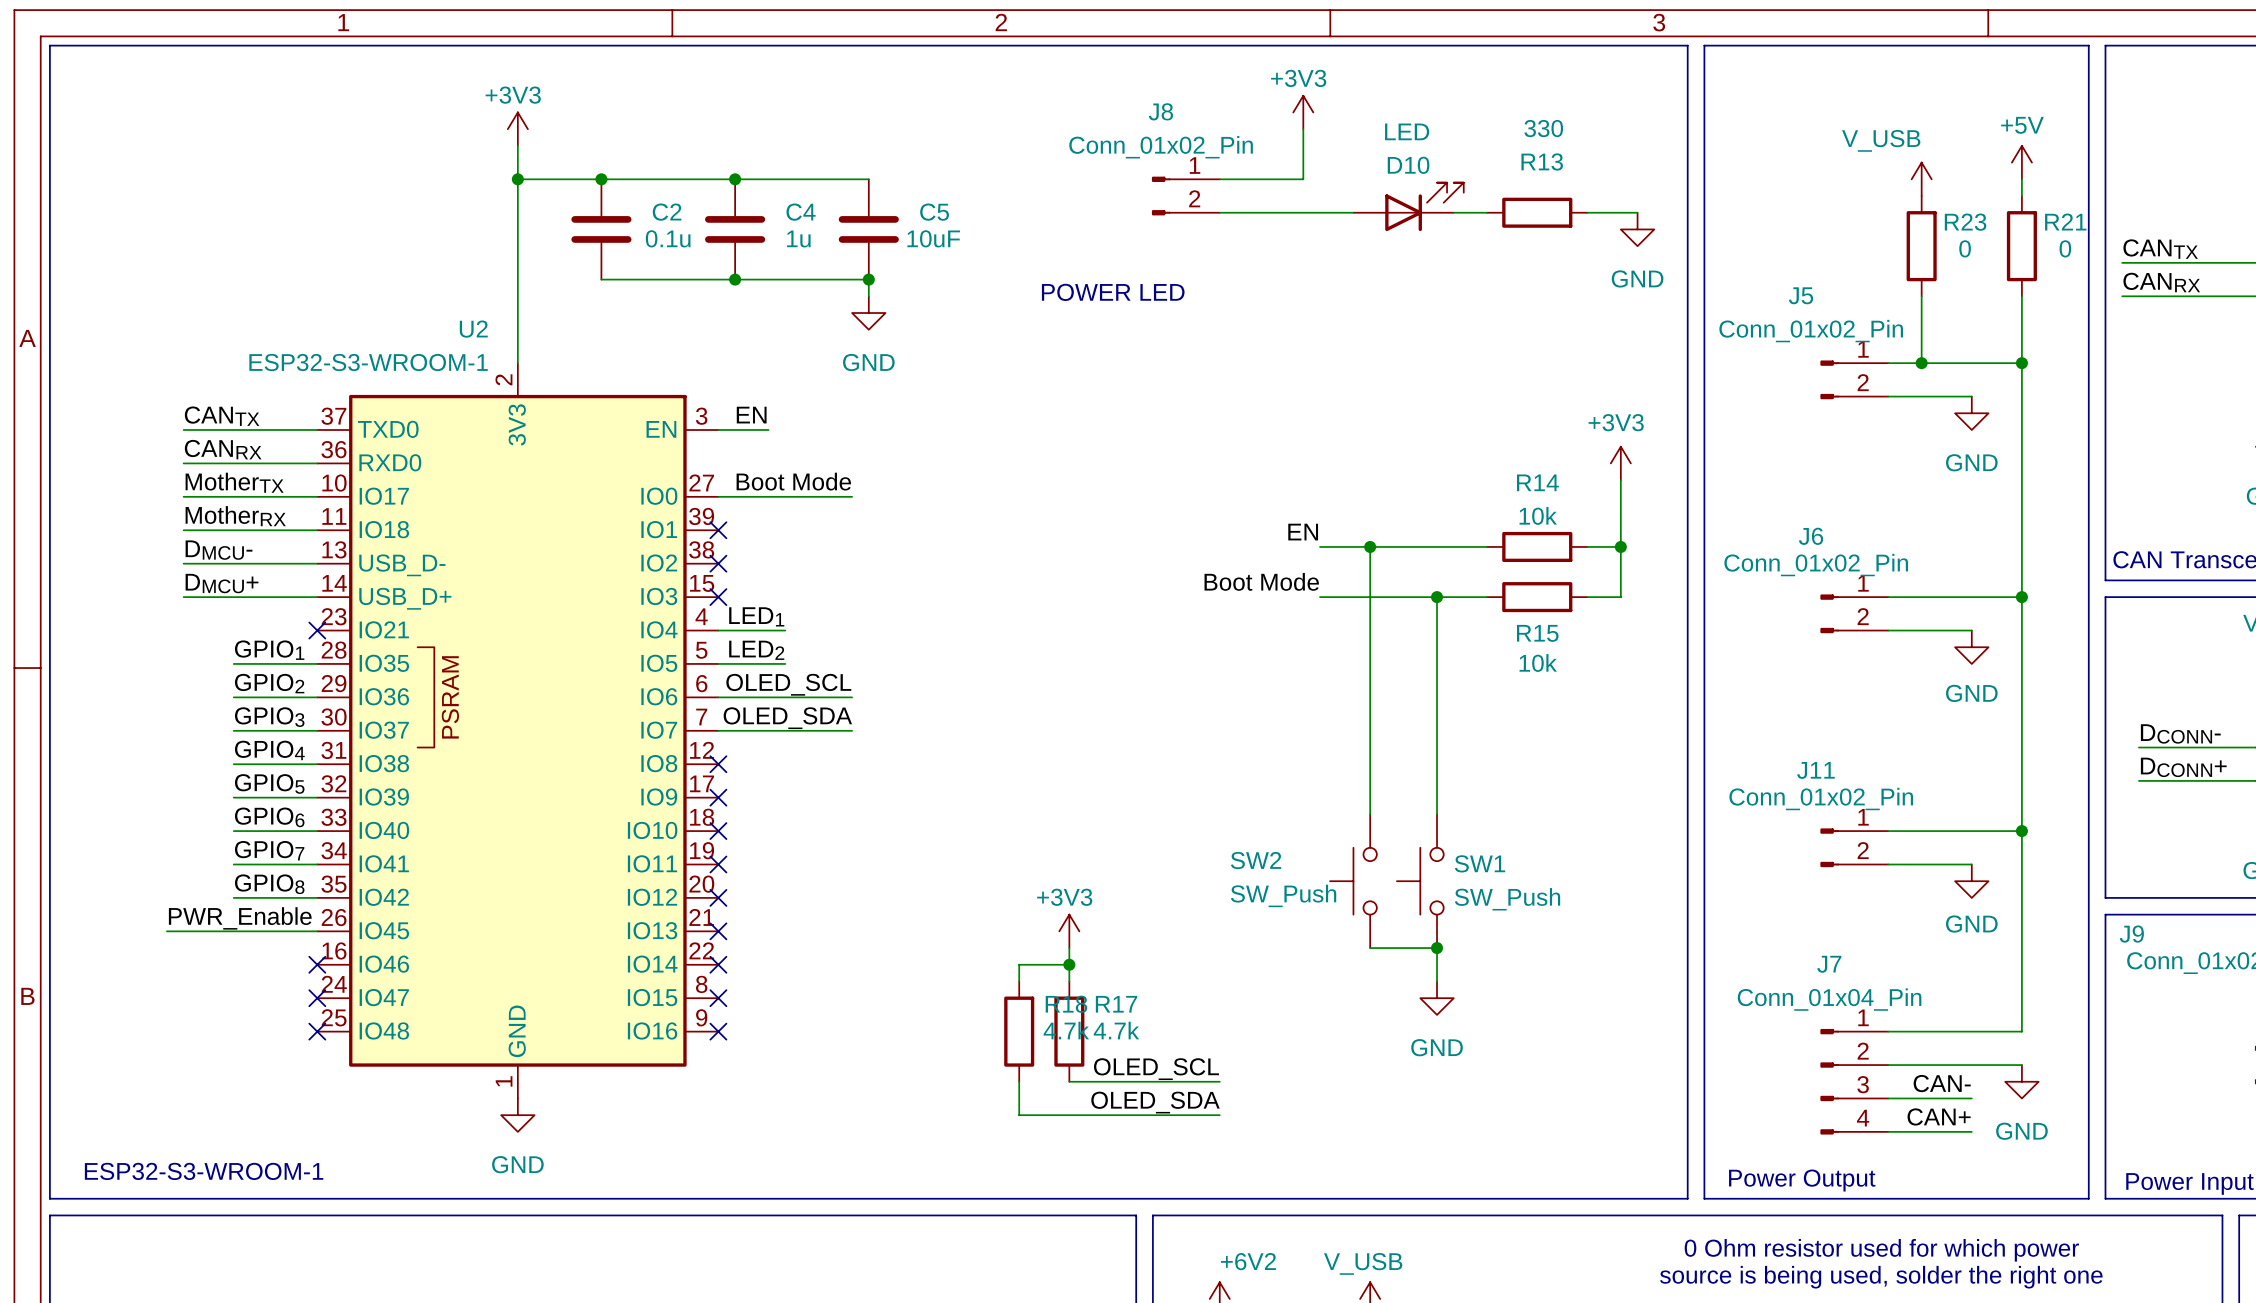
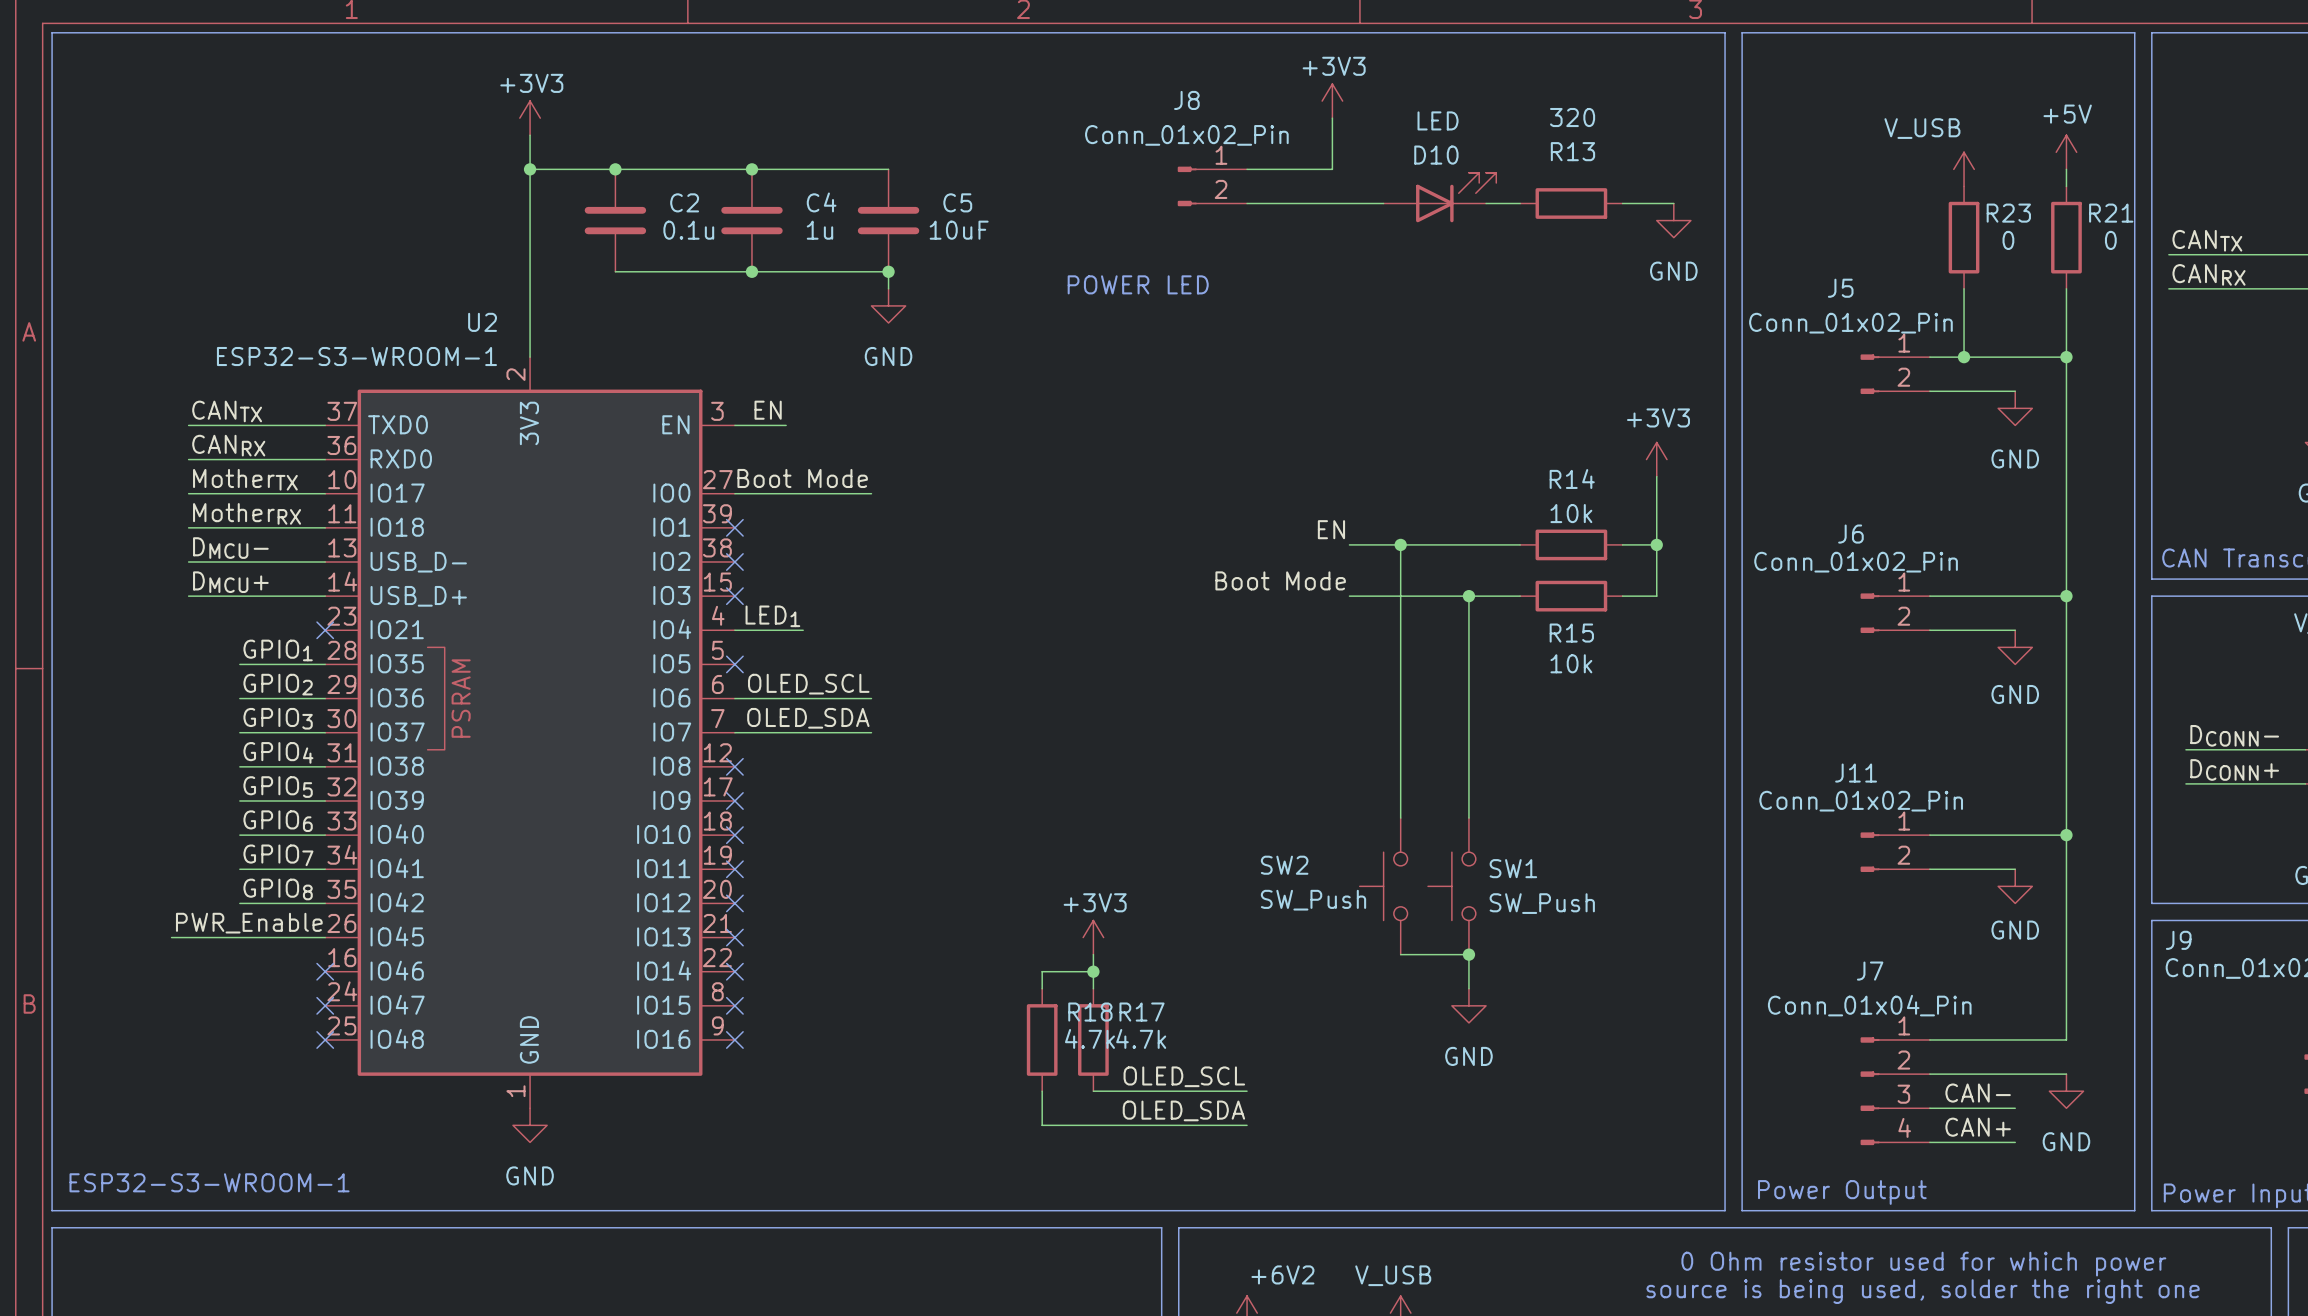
R13 value: 330 (1543, 128) -> 320 (1572, 117)
label: LED2 (756, 650) -> none
wire: (718, 663) (785, 663) -> none
no-connect mark: none -> (734, 664)

